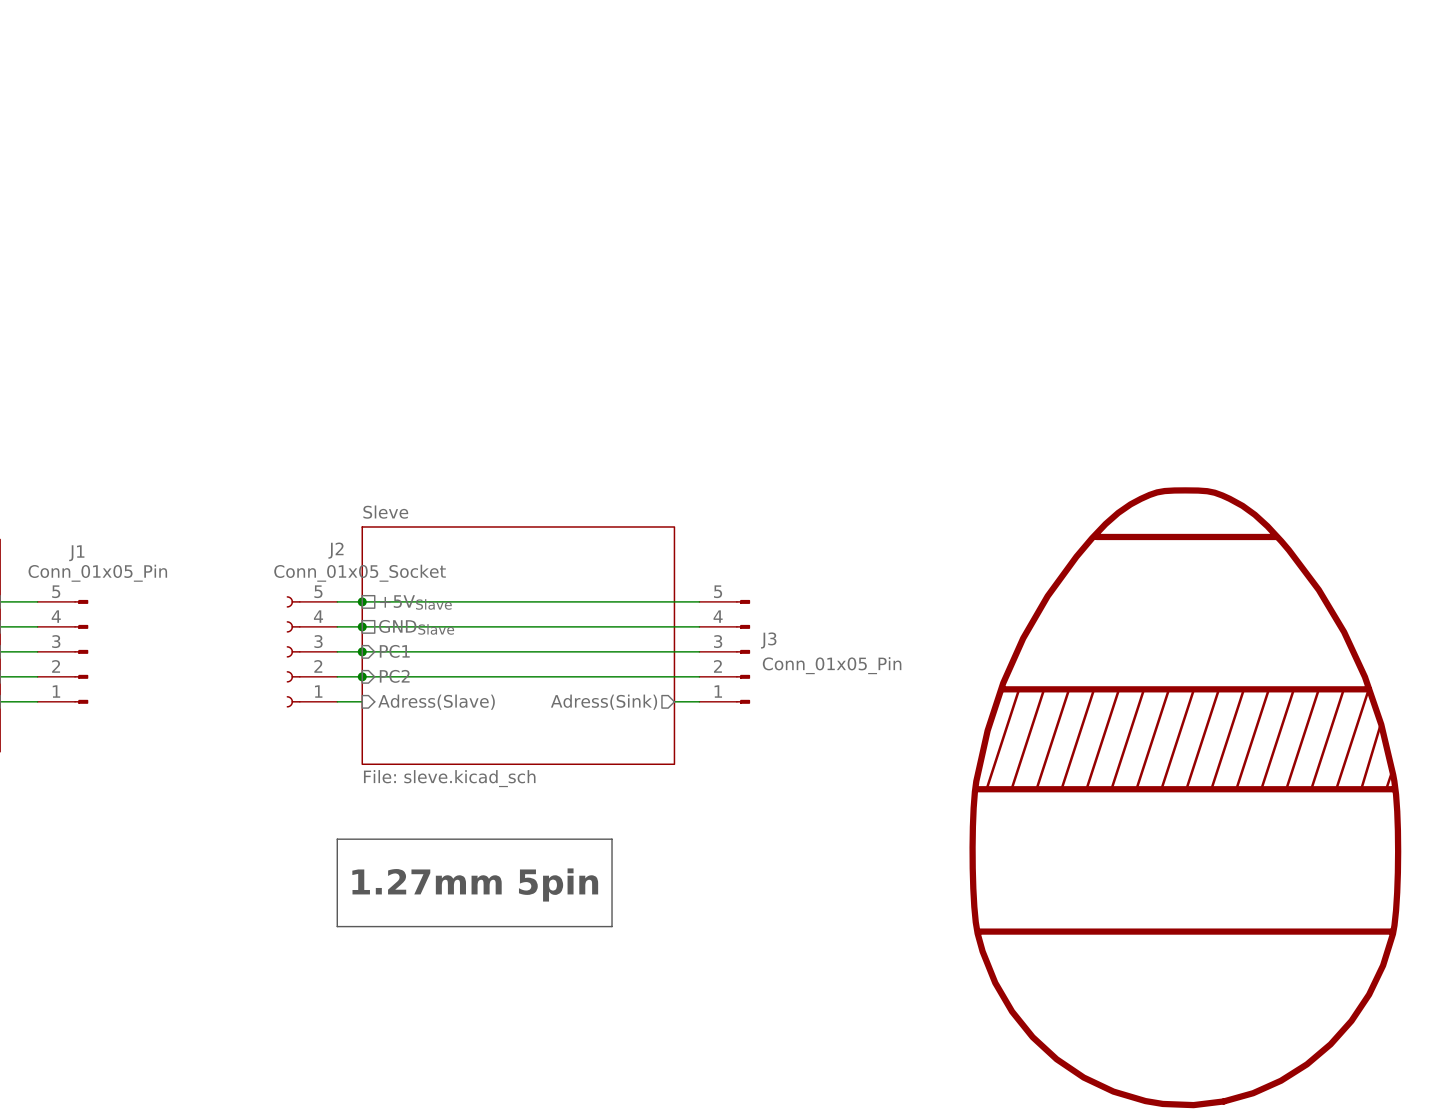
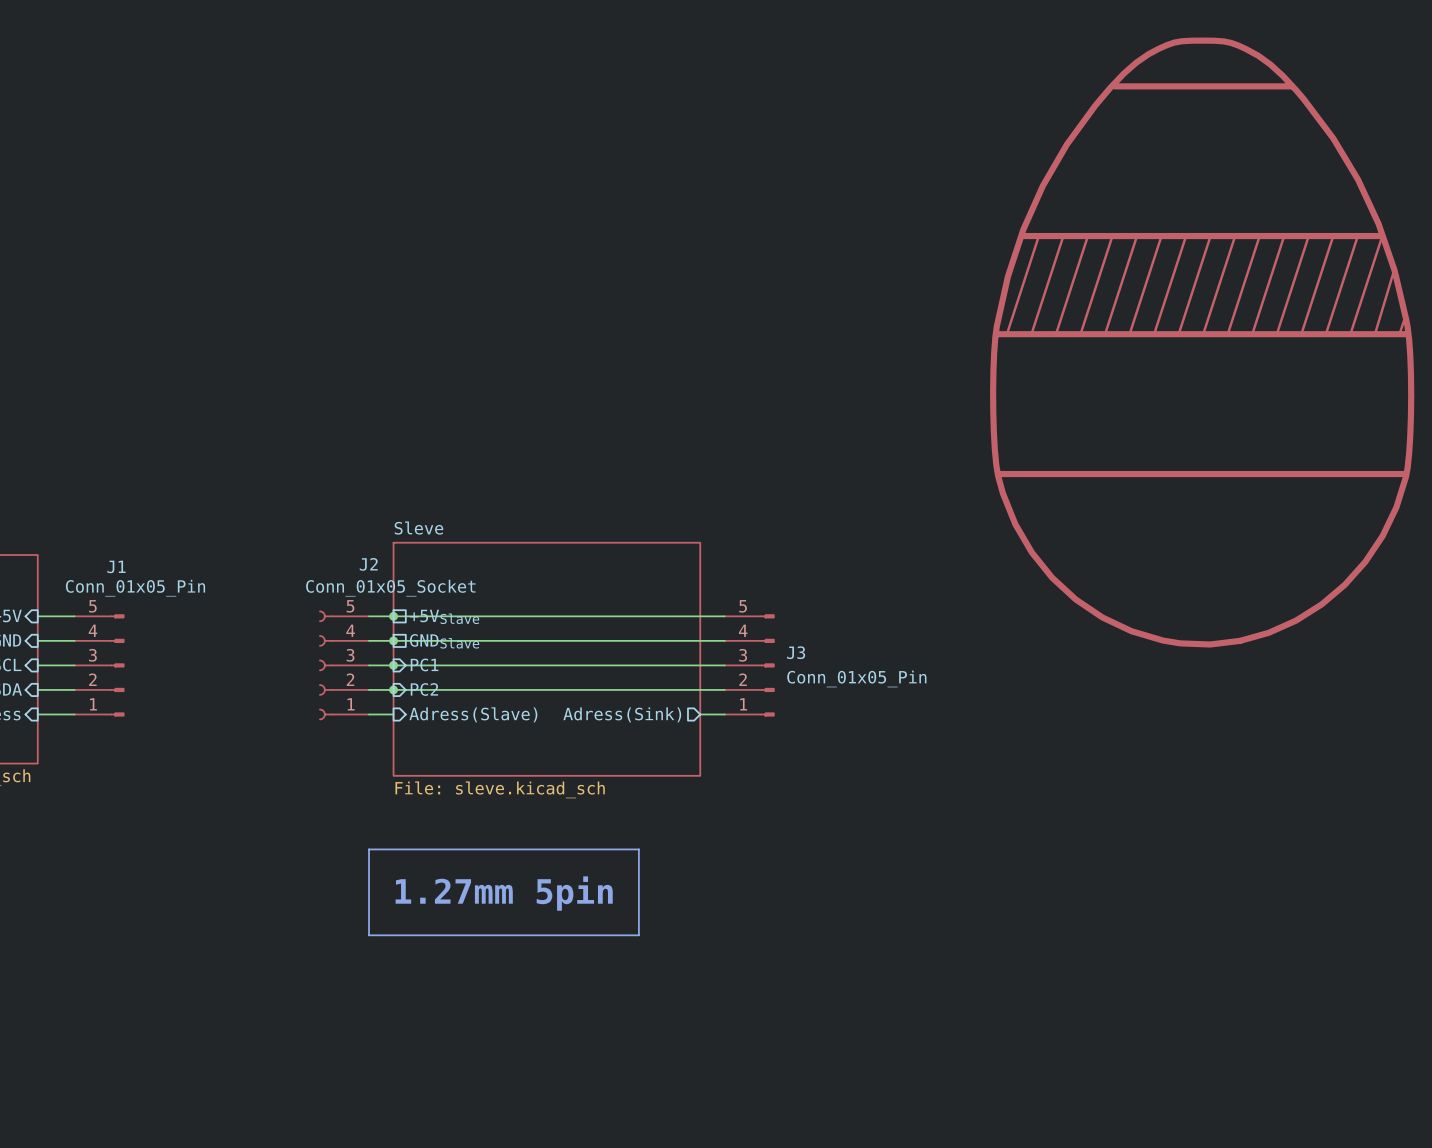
part: none -> (1202, 342)
part: (1185, 797) -> none

